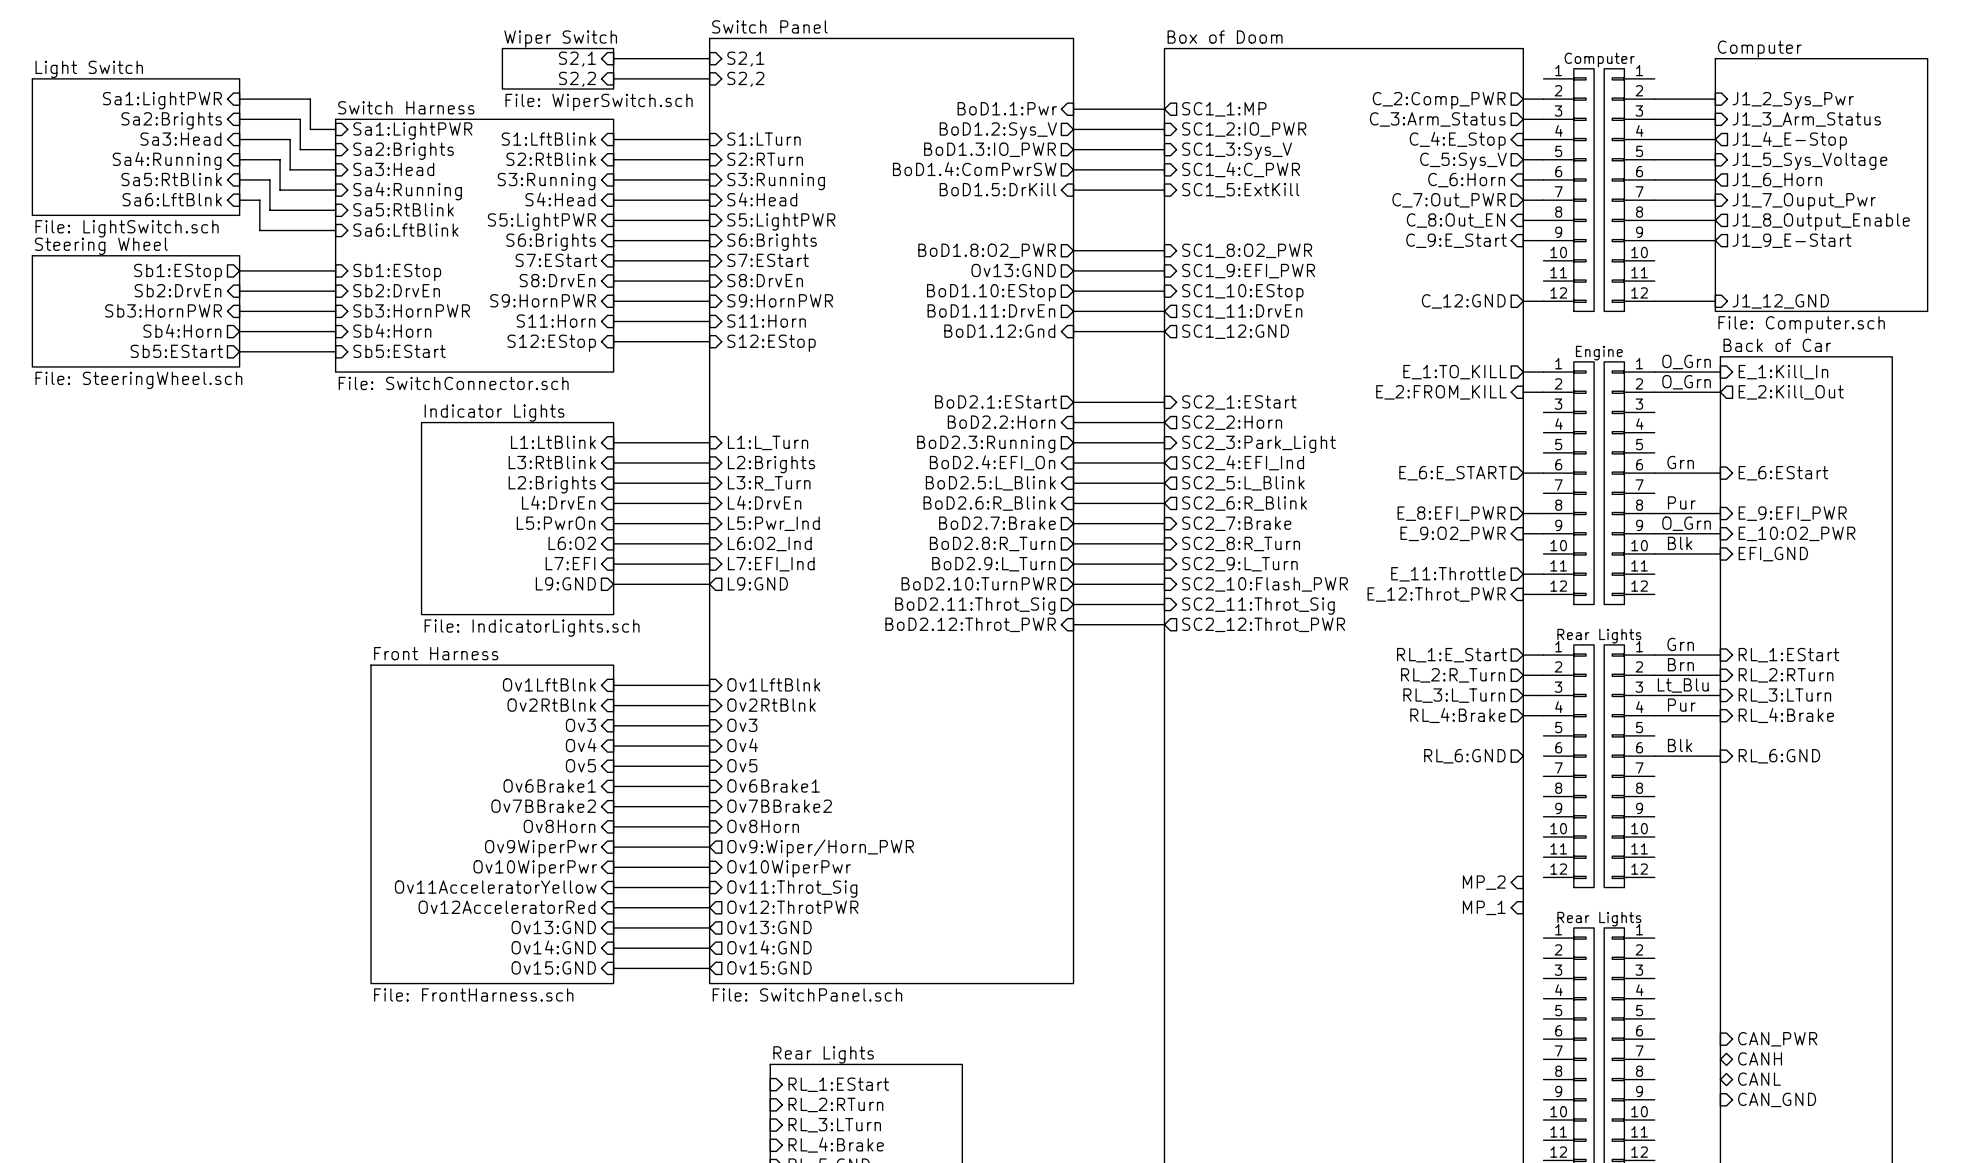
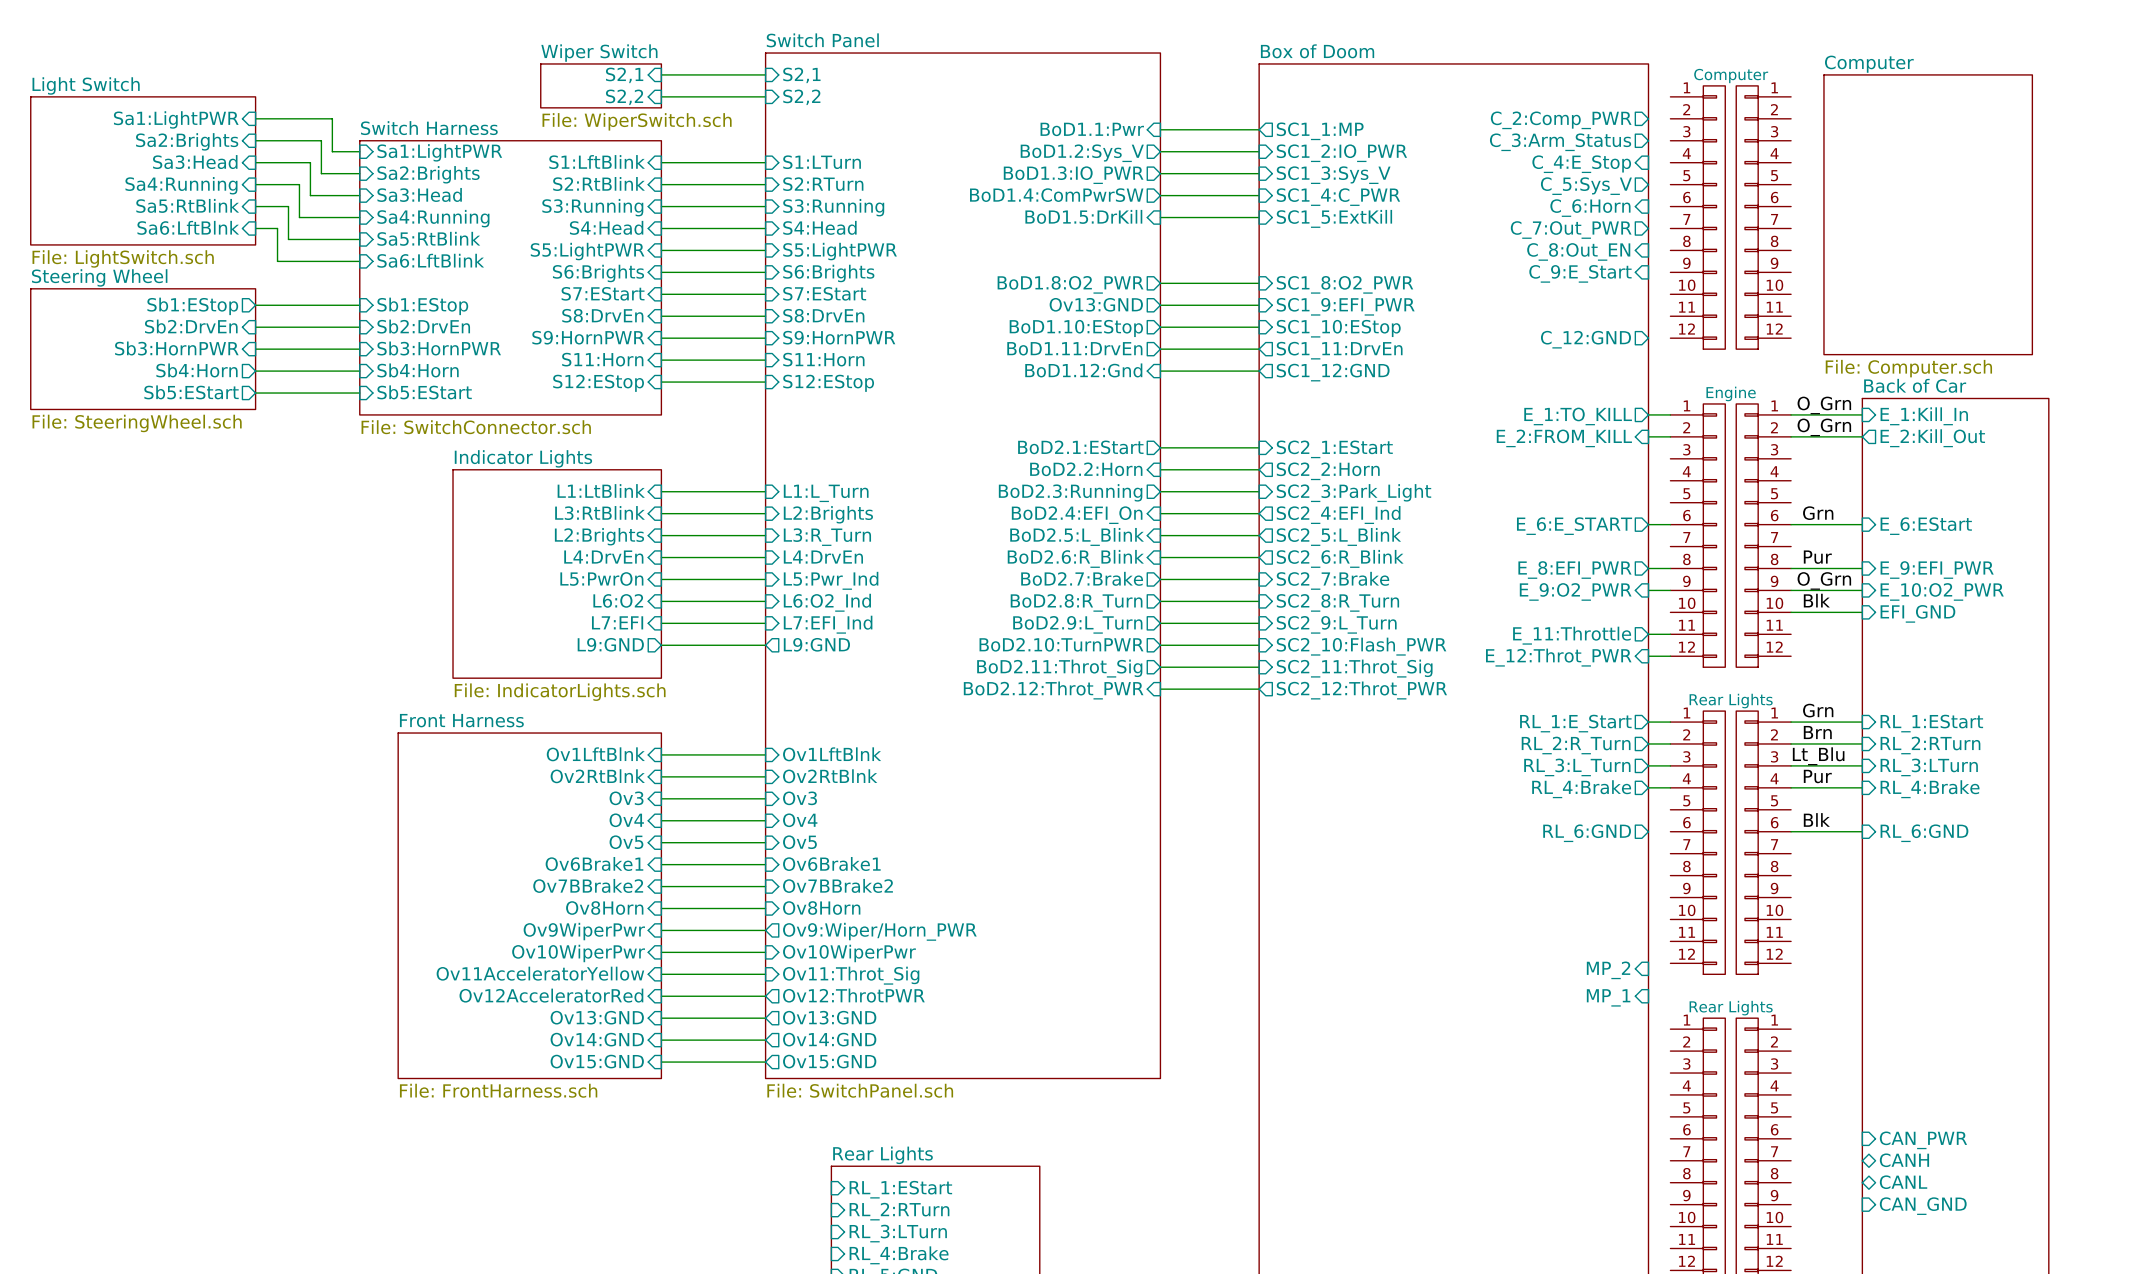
wire: (1523, 99) (1543, 99) -> none
wire: (1654, 99) (1715, 99) -> none
sheet pin: J1_2_Sys_Pwr (1793, 100) -> none
wire: (1523, 119) (1543, 119) -> none
wire: (1654, 119) (1715, 119) -> none
sheet pin: J1_3_Arm_Status (1806, 119) -> none
wire: (1523, 139) (1543, 139) -> none
wire: (1654, 139) (1715, 139) -> none
sheet pin: J1_4_E-Stop (1789, 140) -> none
wire: (1523, 159) (1543, 159) -> none
wire: (1654, 159) (1715, 159) -> none
sheet pin: J1_5_Sys_Voltage (1809, 161) -> none
wire: (1523, 179) (1543, 179) -> none
wire: (1654, 179) (1715, 179) -> none
sheet pin: J1_6_Horn (1777, 180) -> none
sheet Computer: File: Computer.sch (1821, 185) -> none
sheet Computer: none -> File: Computer.sch (1928, 214)
wire: (1523, 200) (1543, 200) -> none
wire: (1654, 200) (1715, 200) -> none
sheet pin: J1_7_Ouput_Pwr (1804, 201) -> none
wire: (1523, 220) (1543, 220) -> none
wire: (1654, 220) (1715, 220) -> none
sheet pin: J1_8_Output_Enable (1821, 221) -> none
wire: (1523, 240) (1543, 240) -> none
wire: (1654, 240) (1715, 240) -> none
sheet pin: J1_9_E-Start (1791, 240) -> none
wire: (1523, 301) (1543, 301) -> none
wire: (1654, 301) (1715, 301) -> none
sheet pin: J1_12_GND (1780, 301) -> none

